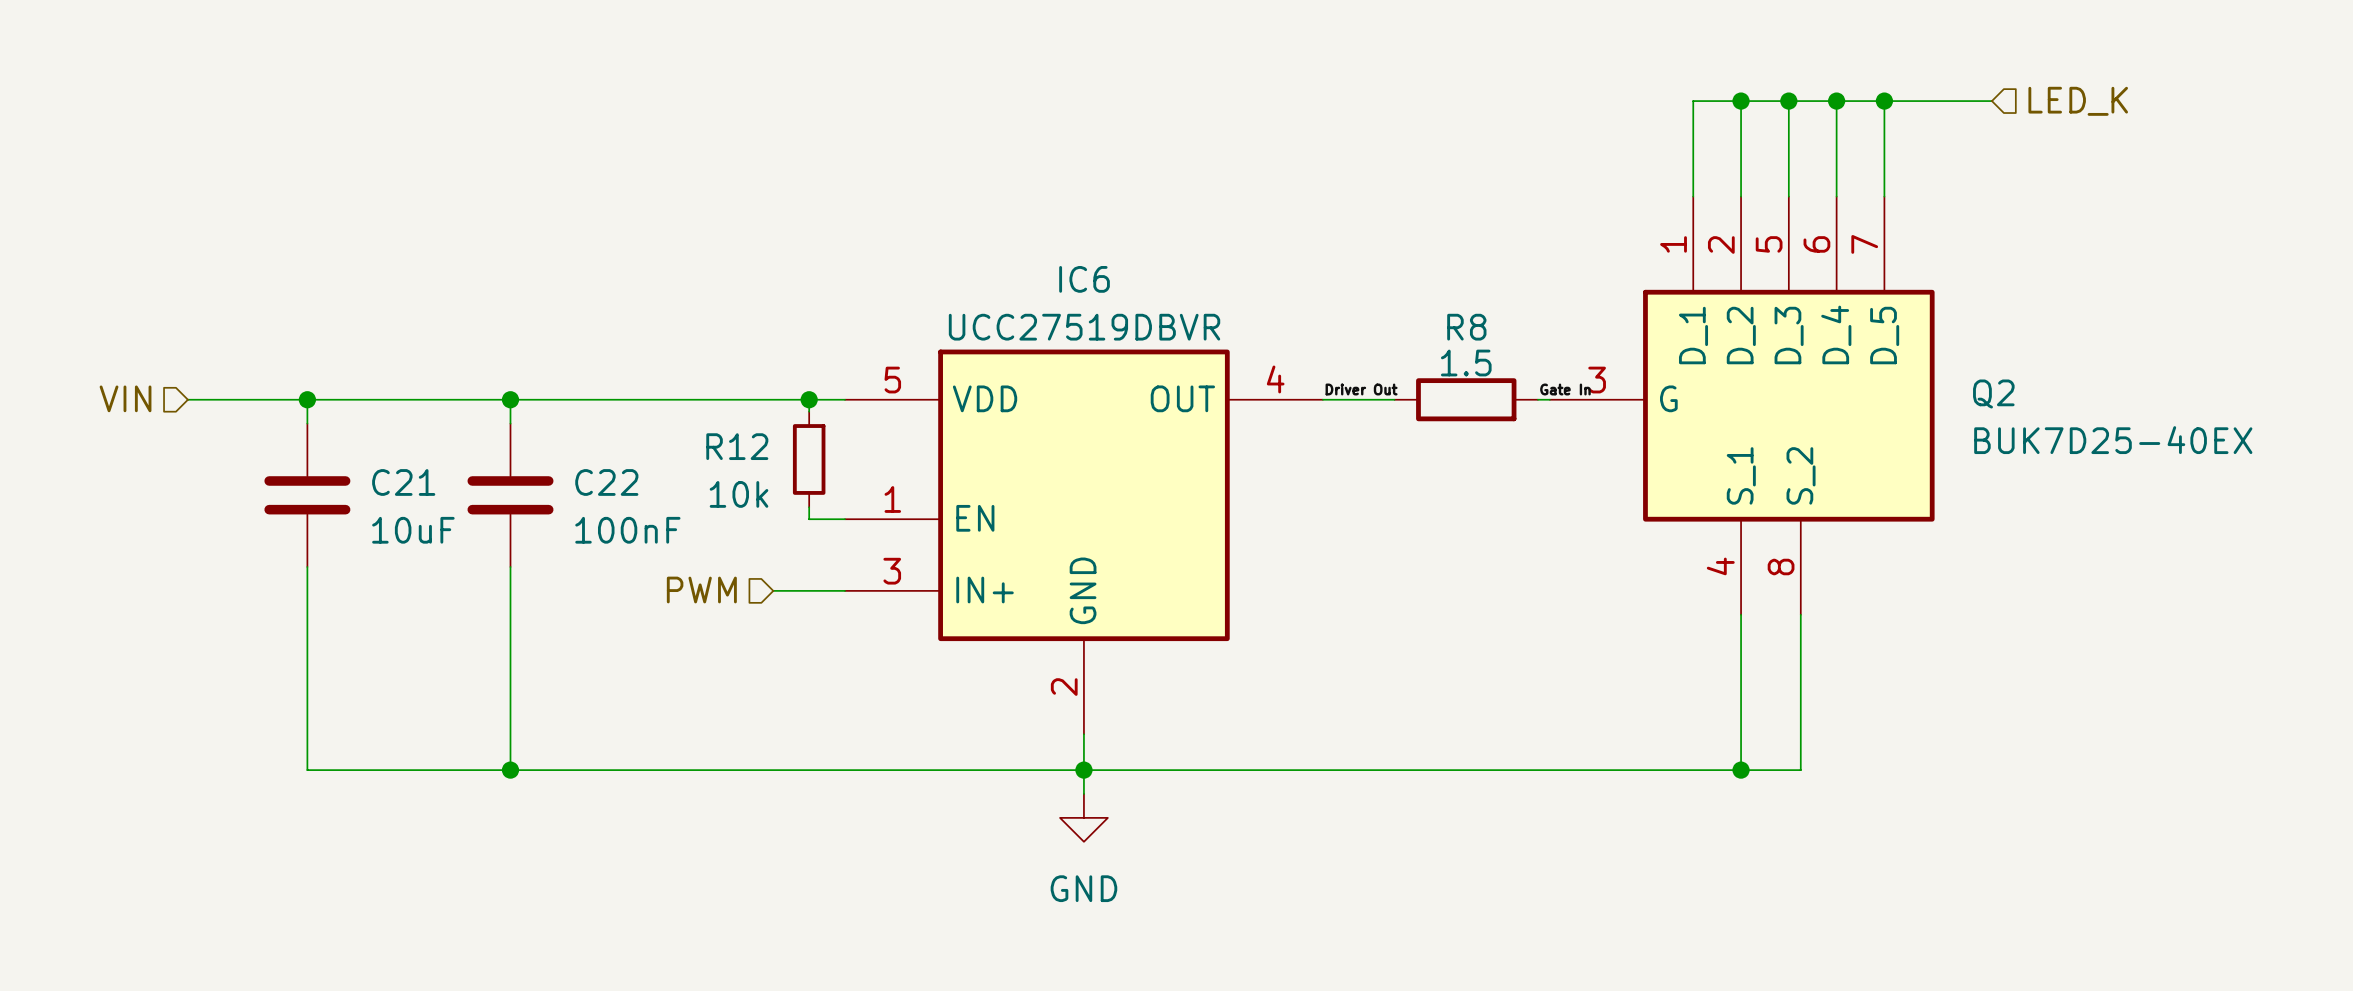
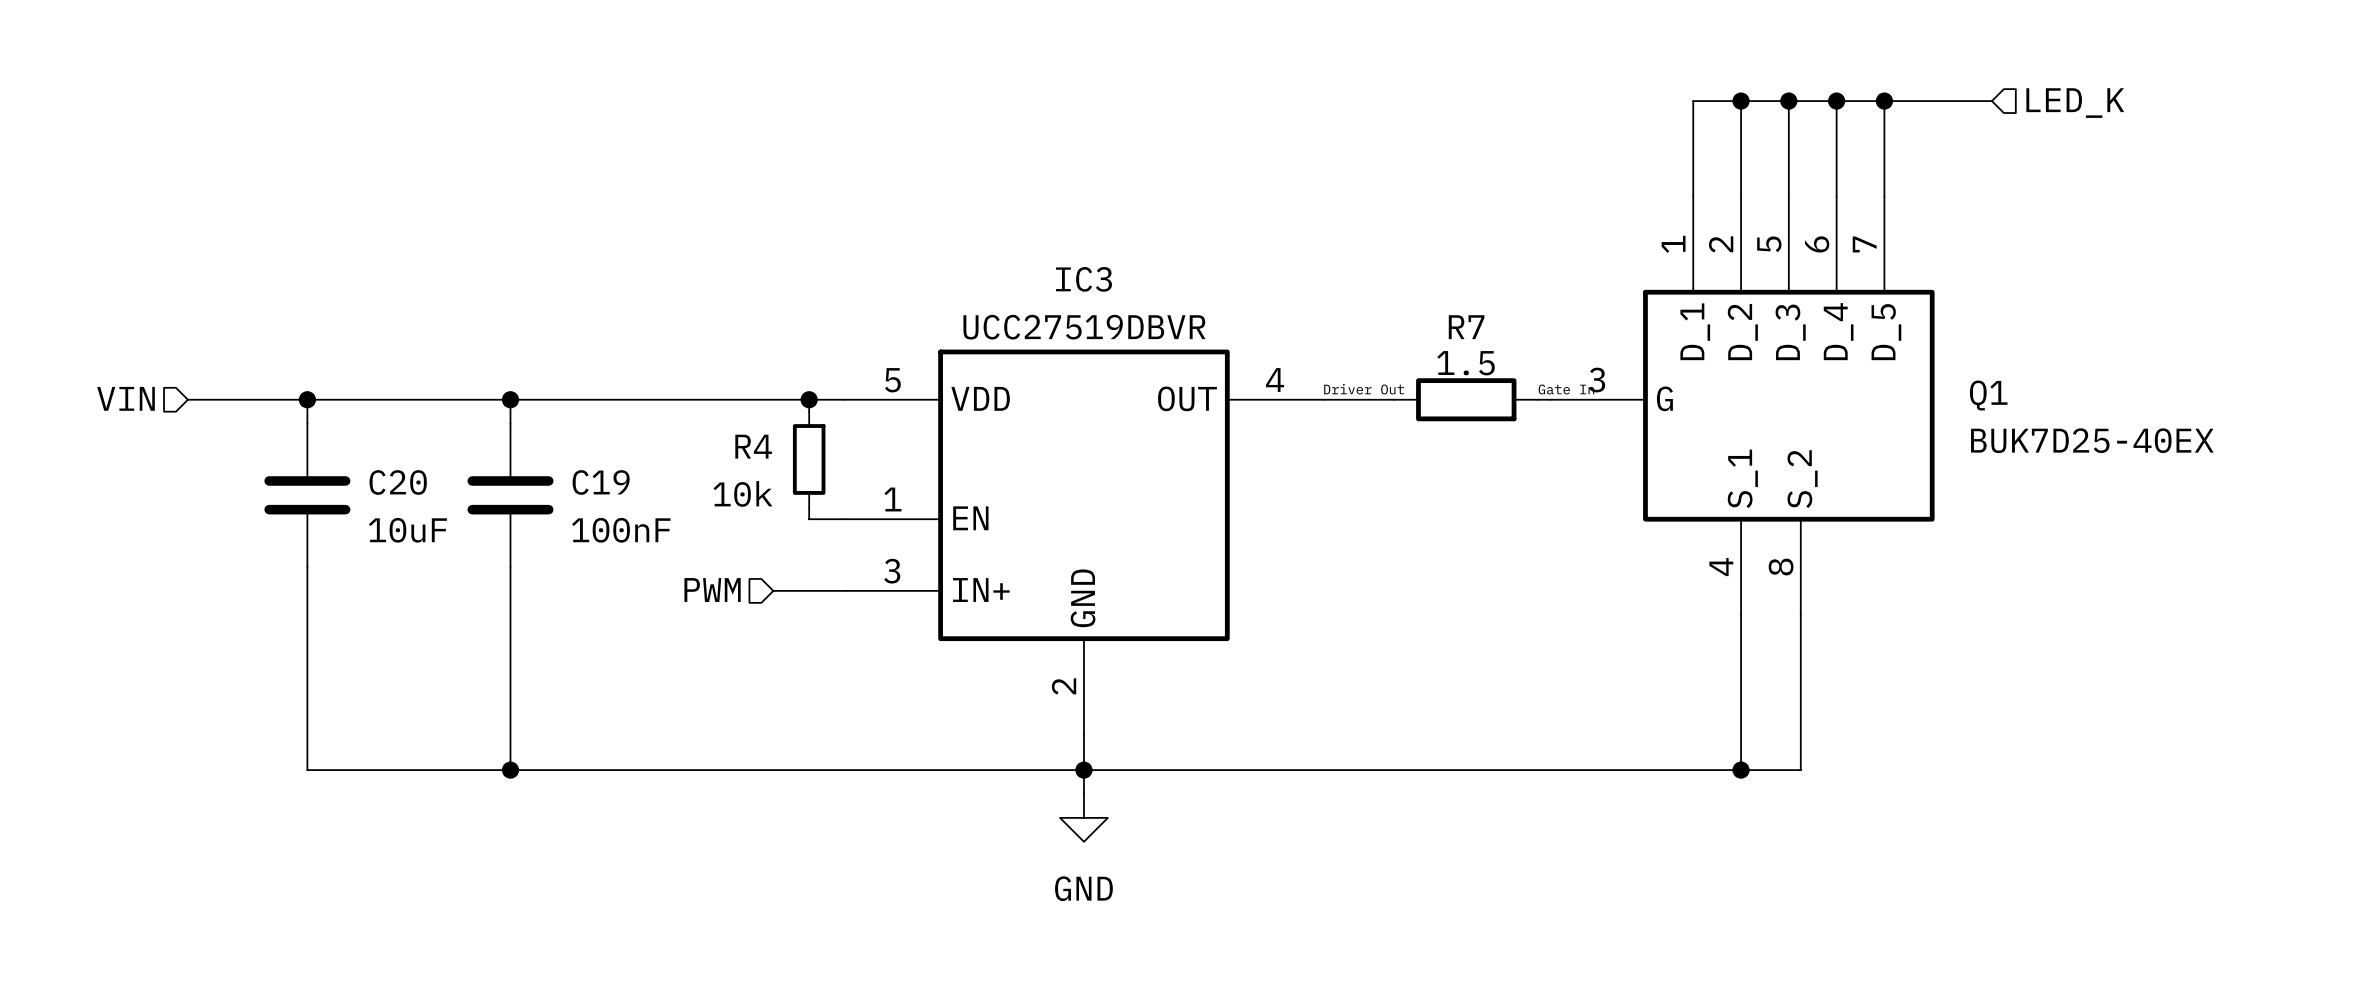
IC6 name: IC6 (1084, 279) -> IC3 (1083, 279)
R8 name: R8 (1466, 327) -> R7 (1466, 327)
Q2 name: Q2 (1993, 394) -> Q1 (1988, 395)
R12 name: R12 (737, 446) -> R4 (753, 446)
C21 name: C21 (403, 482) -> C20 (398, 482)
C22 name: C22 (606, 482) -> C19 (601, 482)

